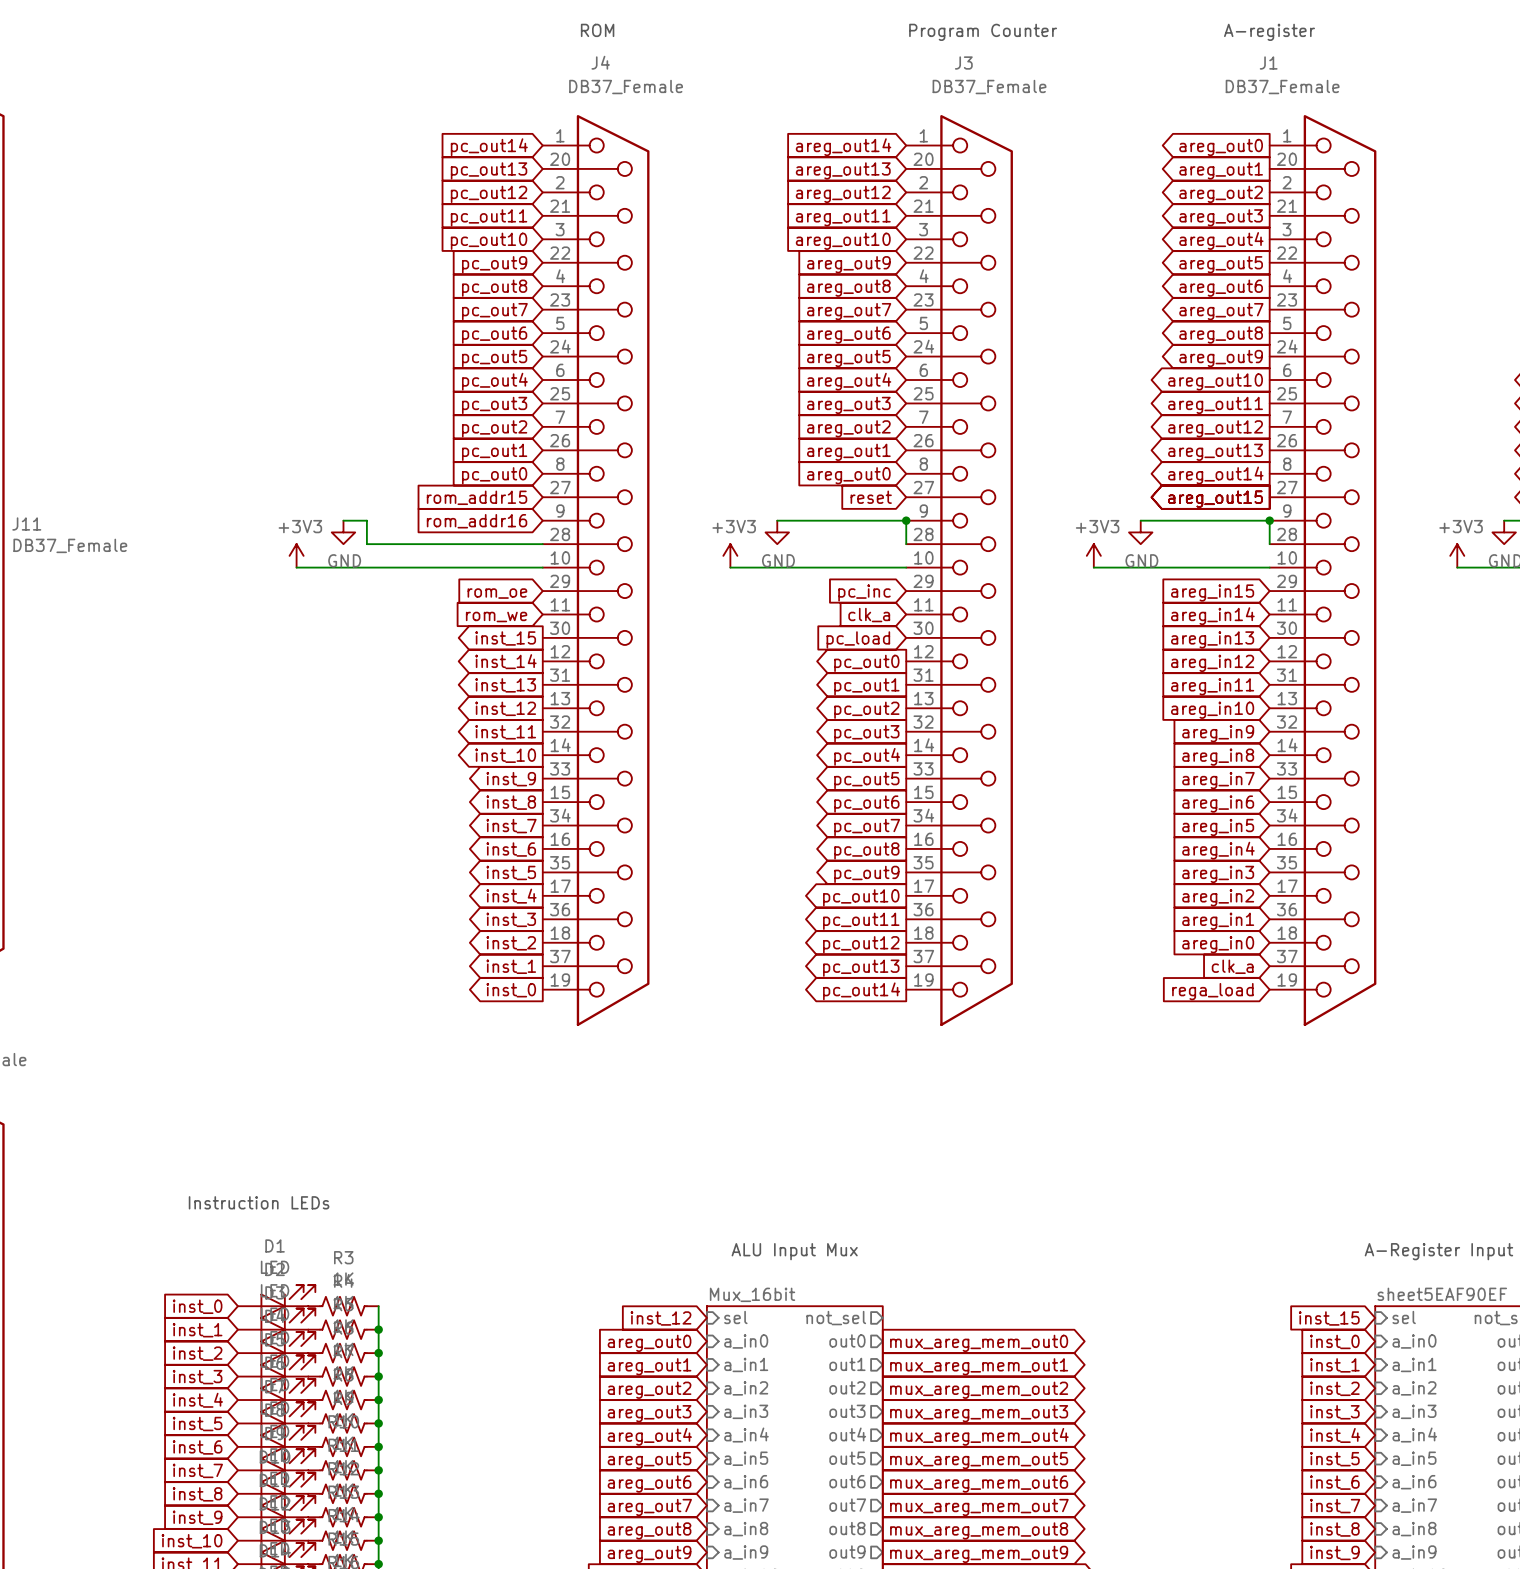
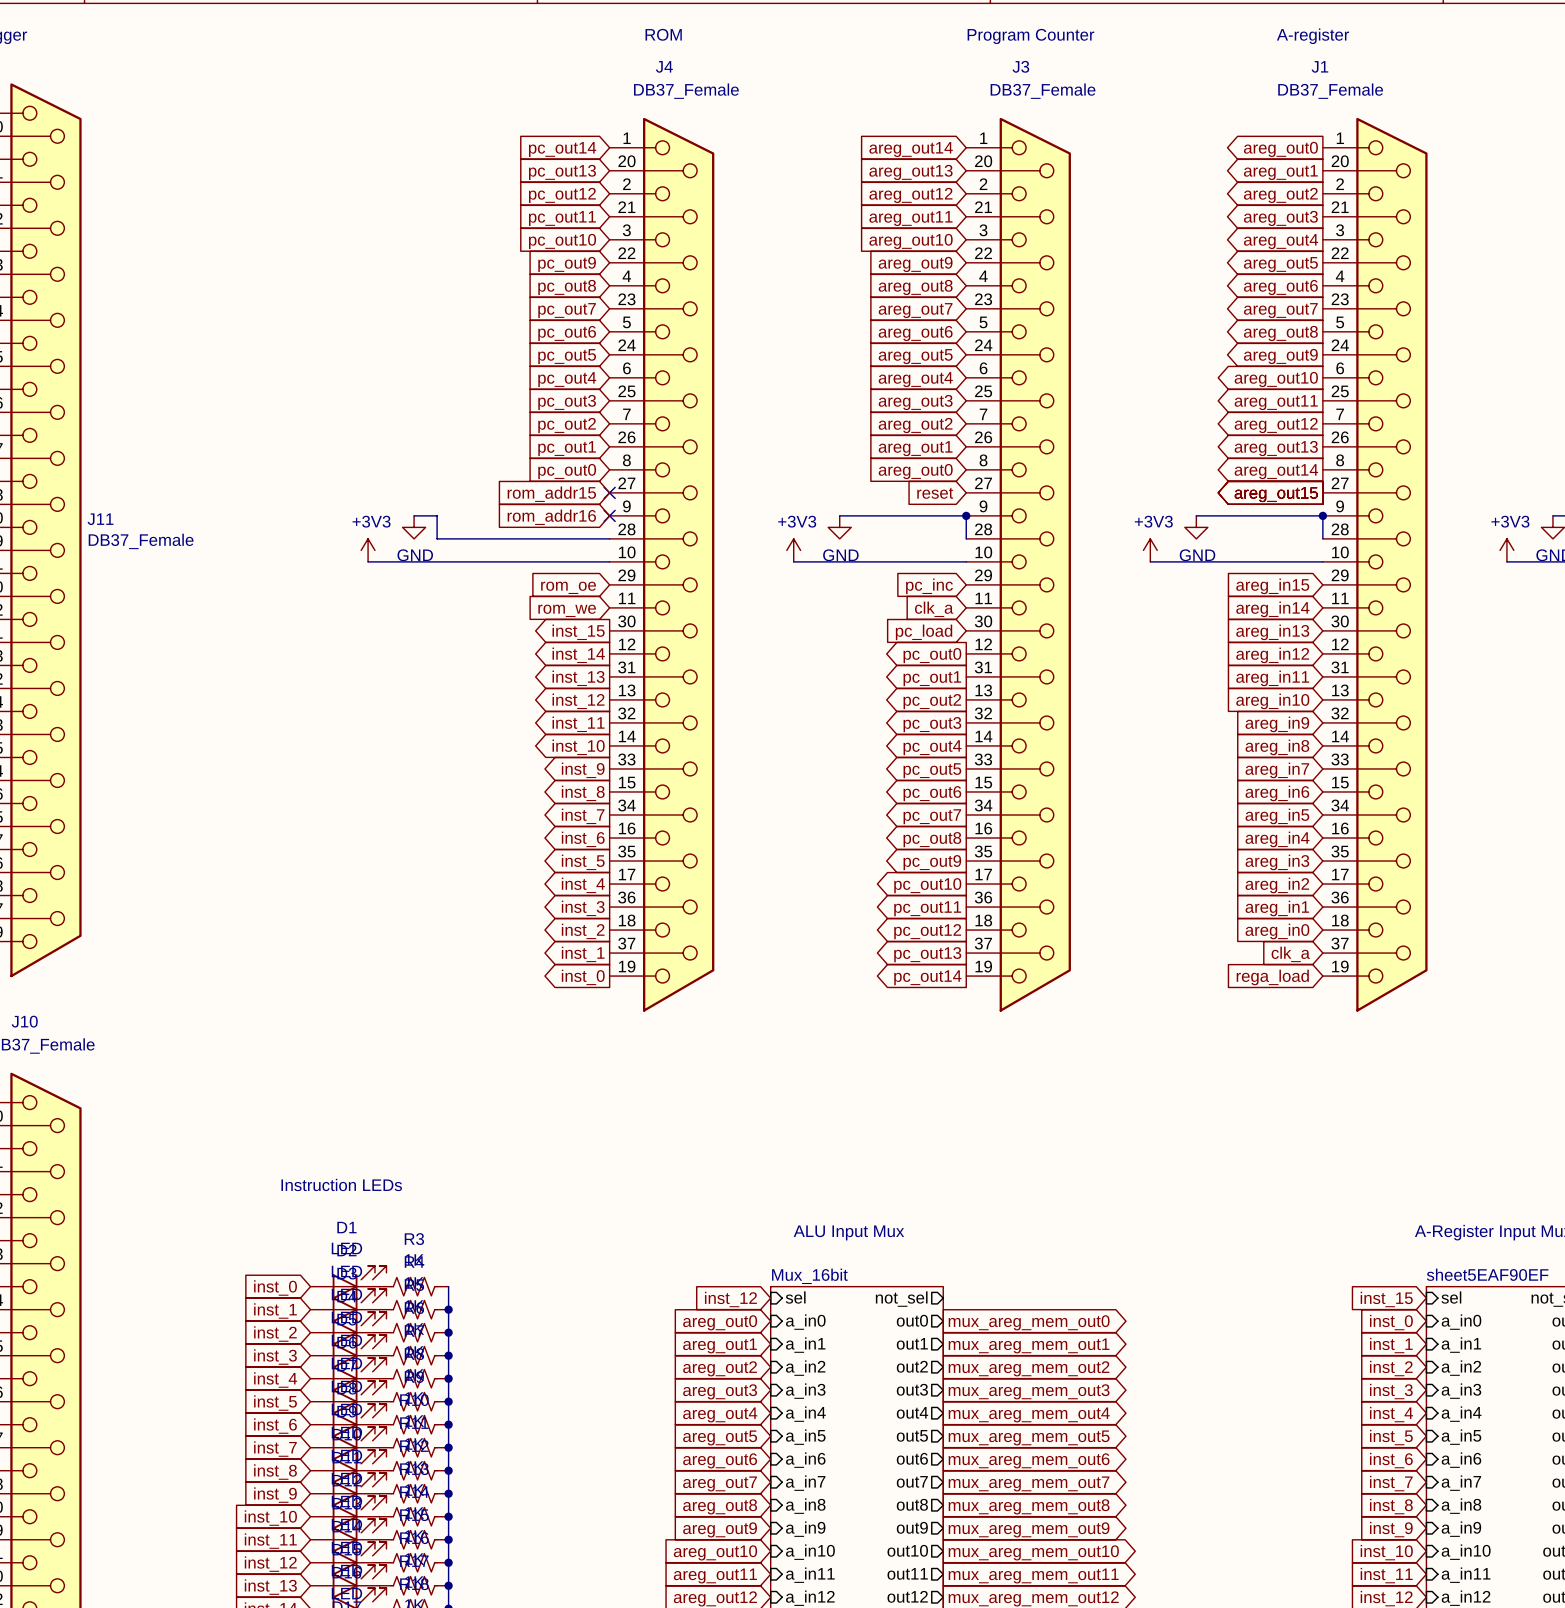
no-connect mark: none -> (609, 492)
no-connect mark: none -> (609, 515)

